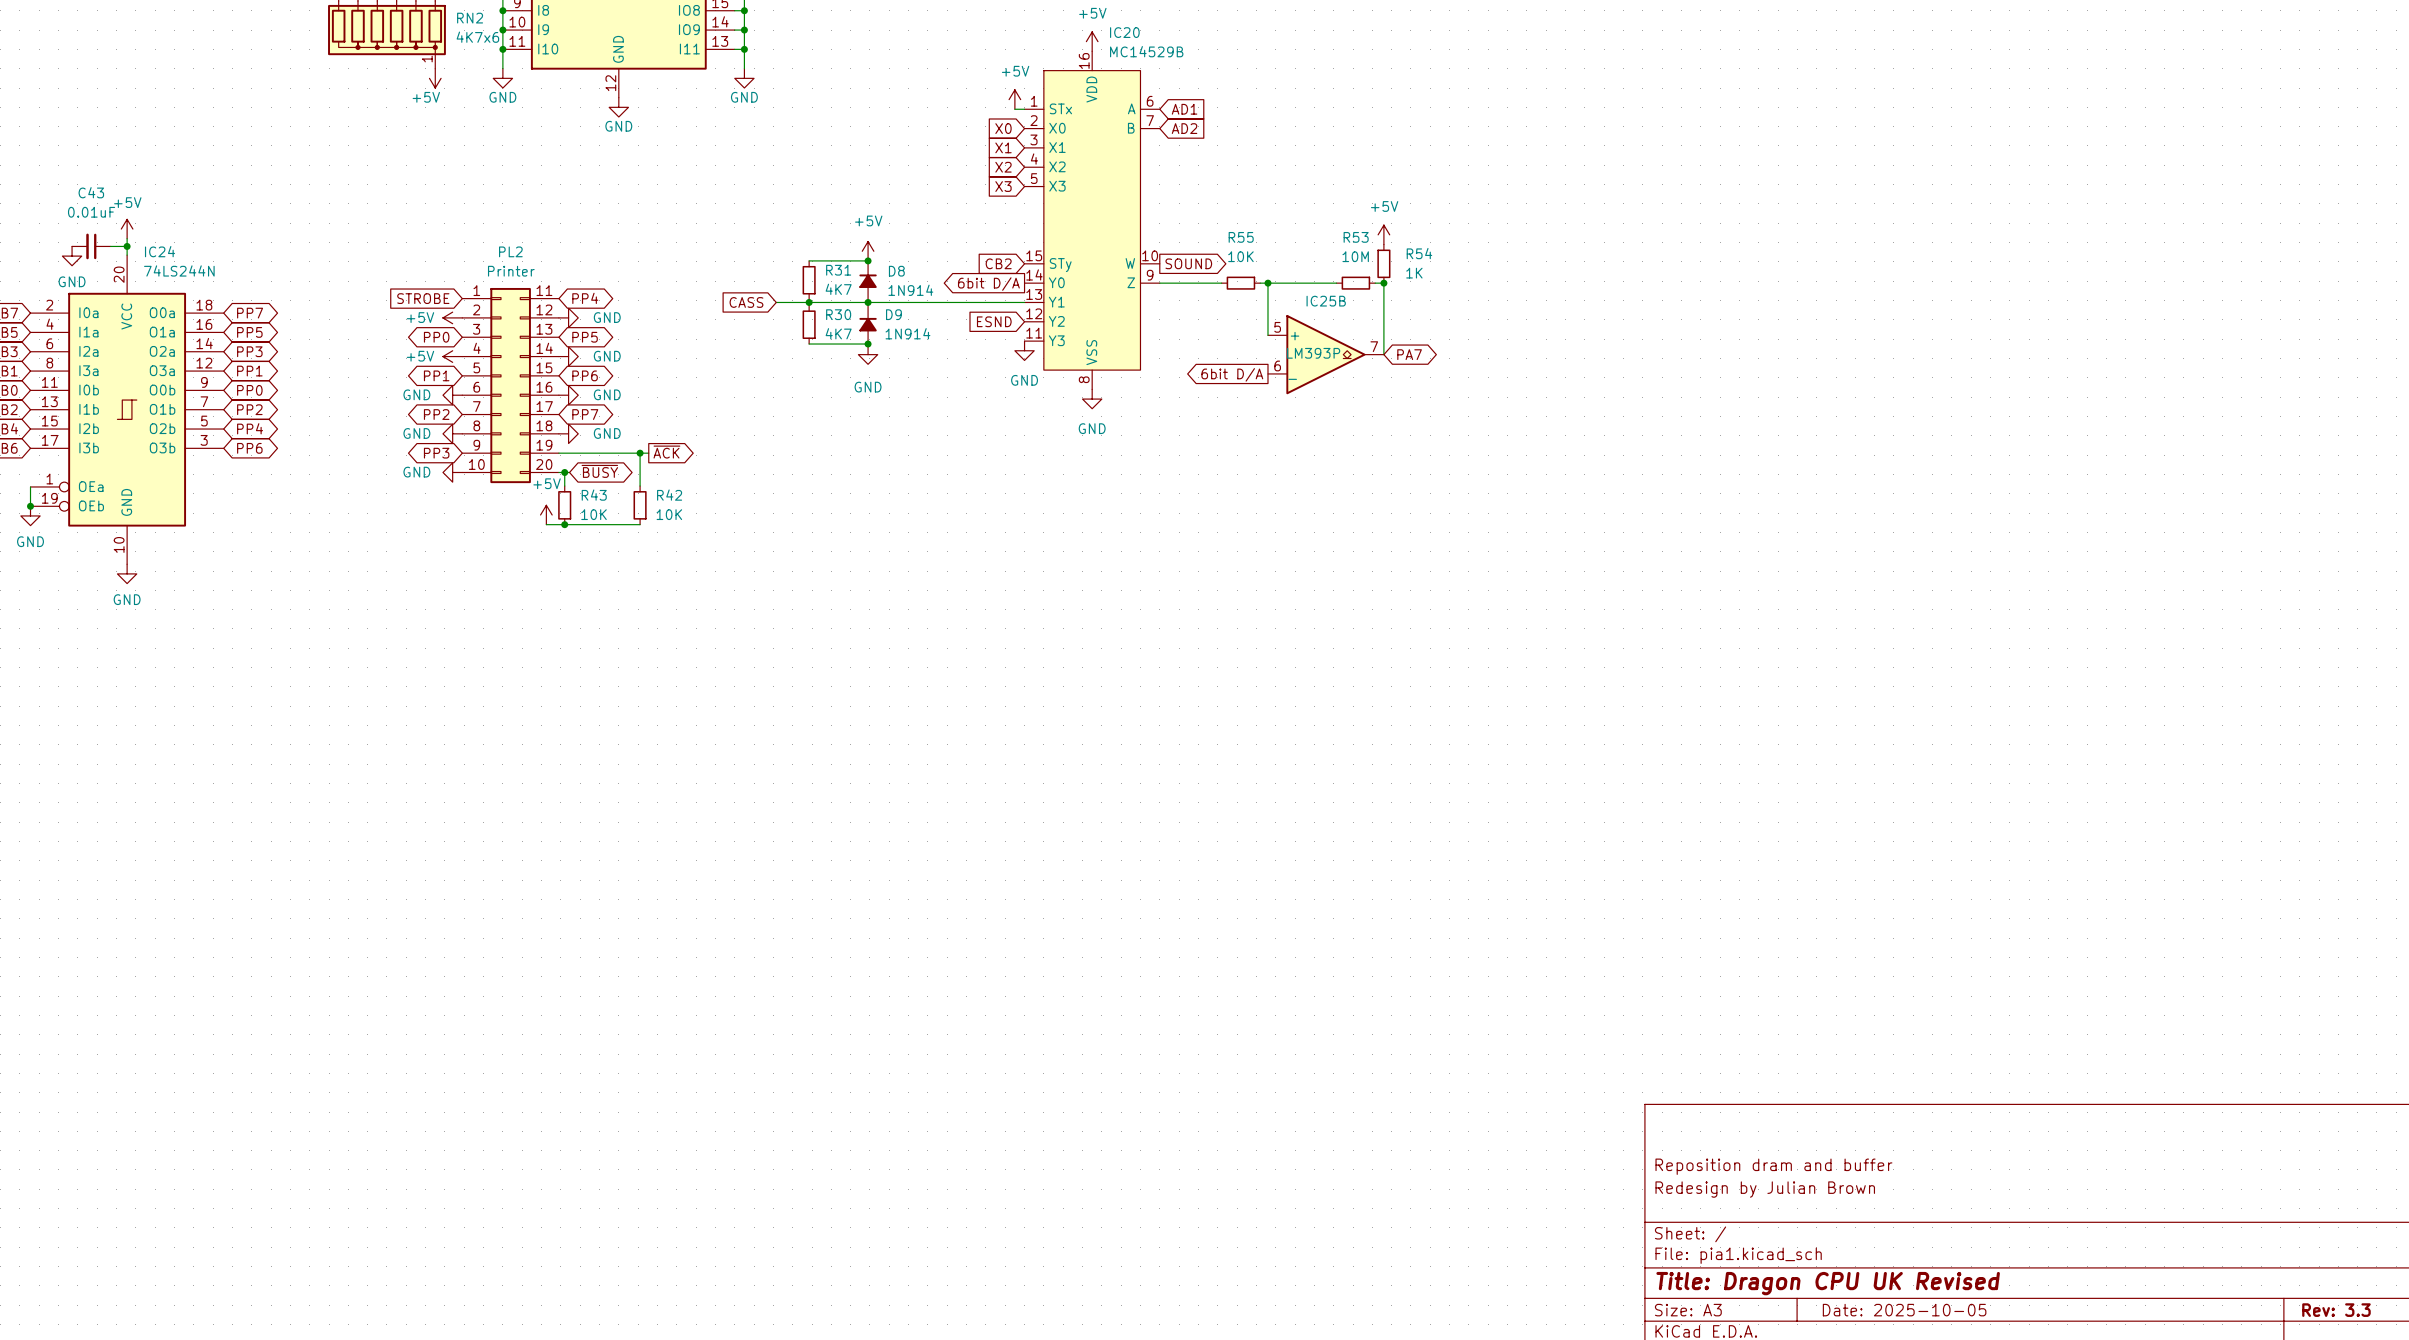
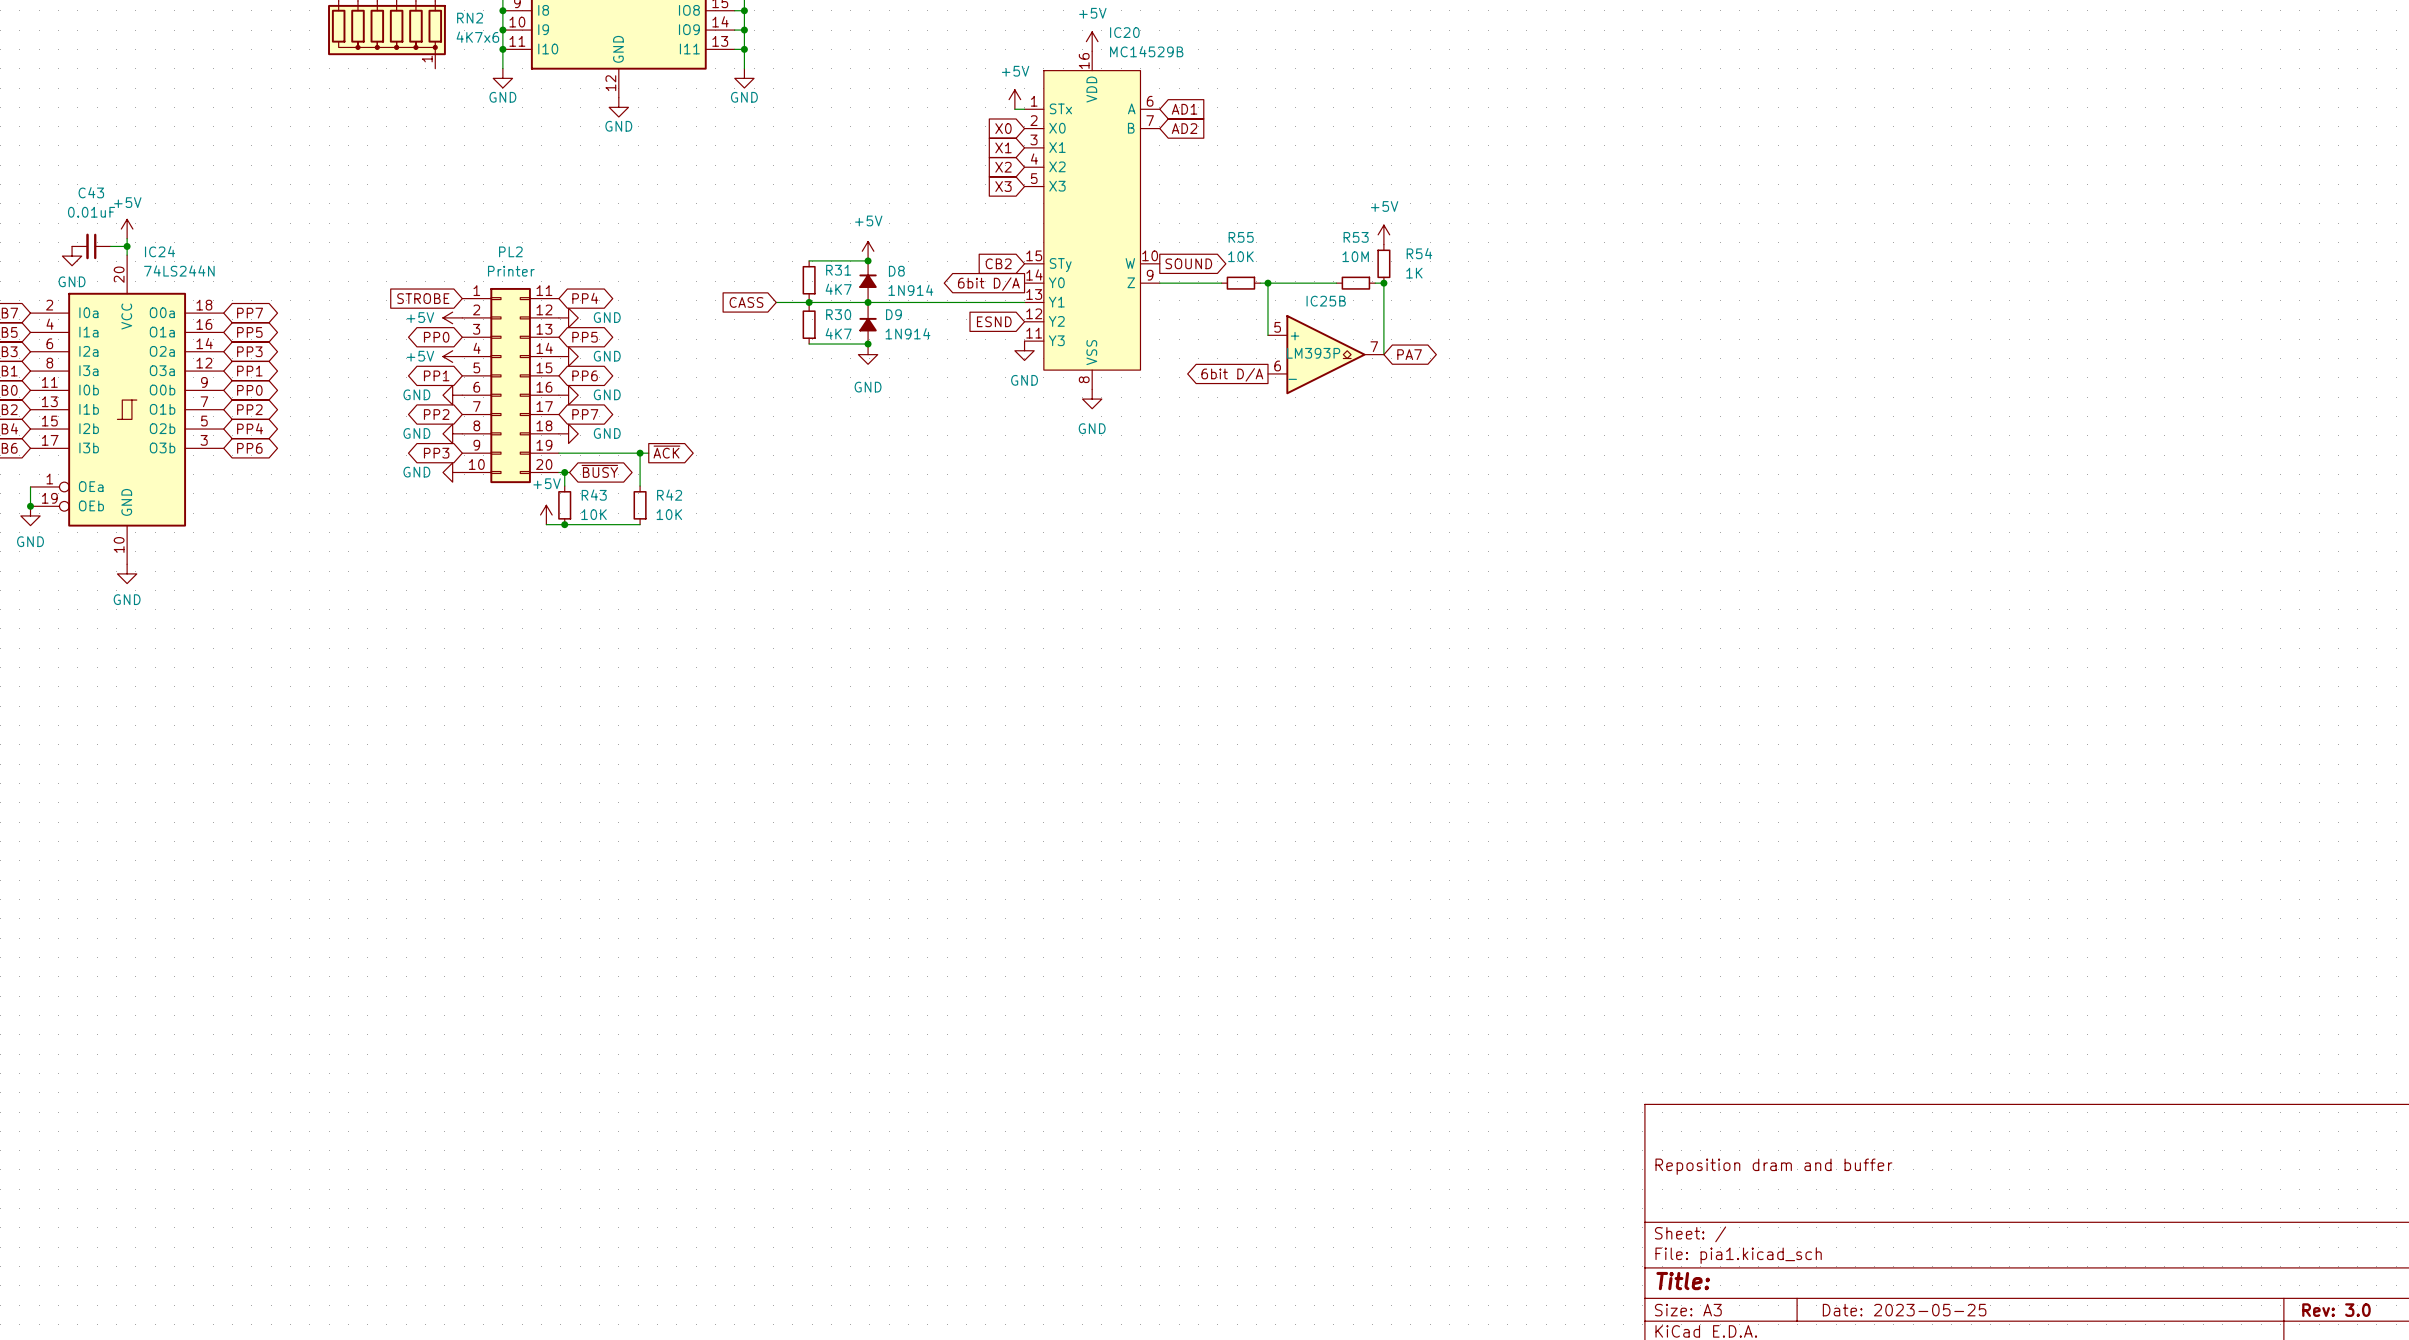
power symbol: +5V (435, 78) -> none
title block: Redesign by Julian Brown (1765, 1189) -> none
title block: Title: Dragon CPU UK Revised (1828, 1283) -> Title: (1683, 1281)
title block: Date: 2025-10-05 (1904, 1310) -> Date: 2023-05-25 (1904, 1310)
title block: Rev: 3.3 (2336, 1310) -> Rev: 3.0 (2336, 1310)

